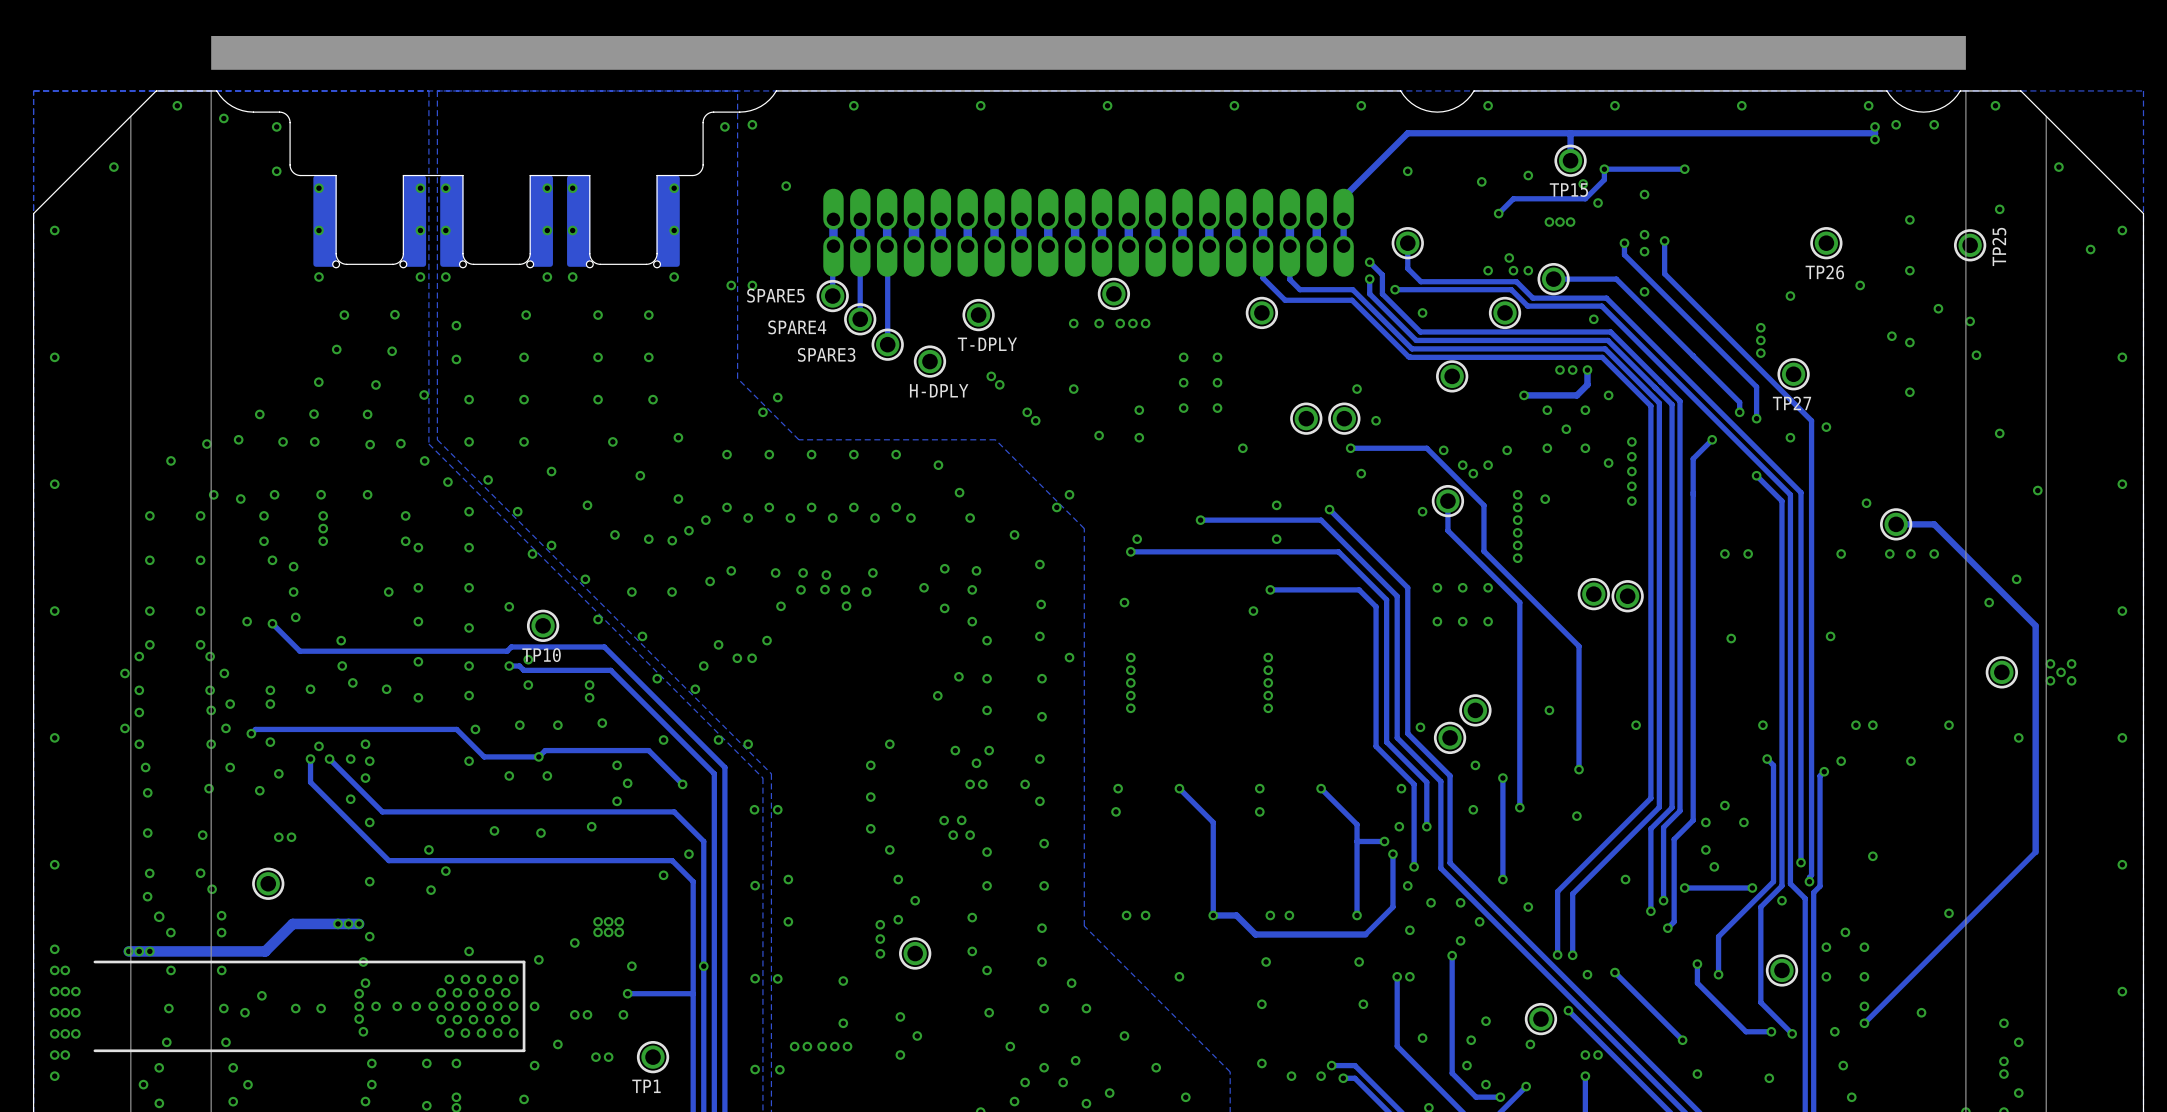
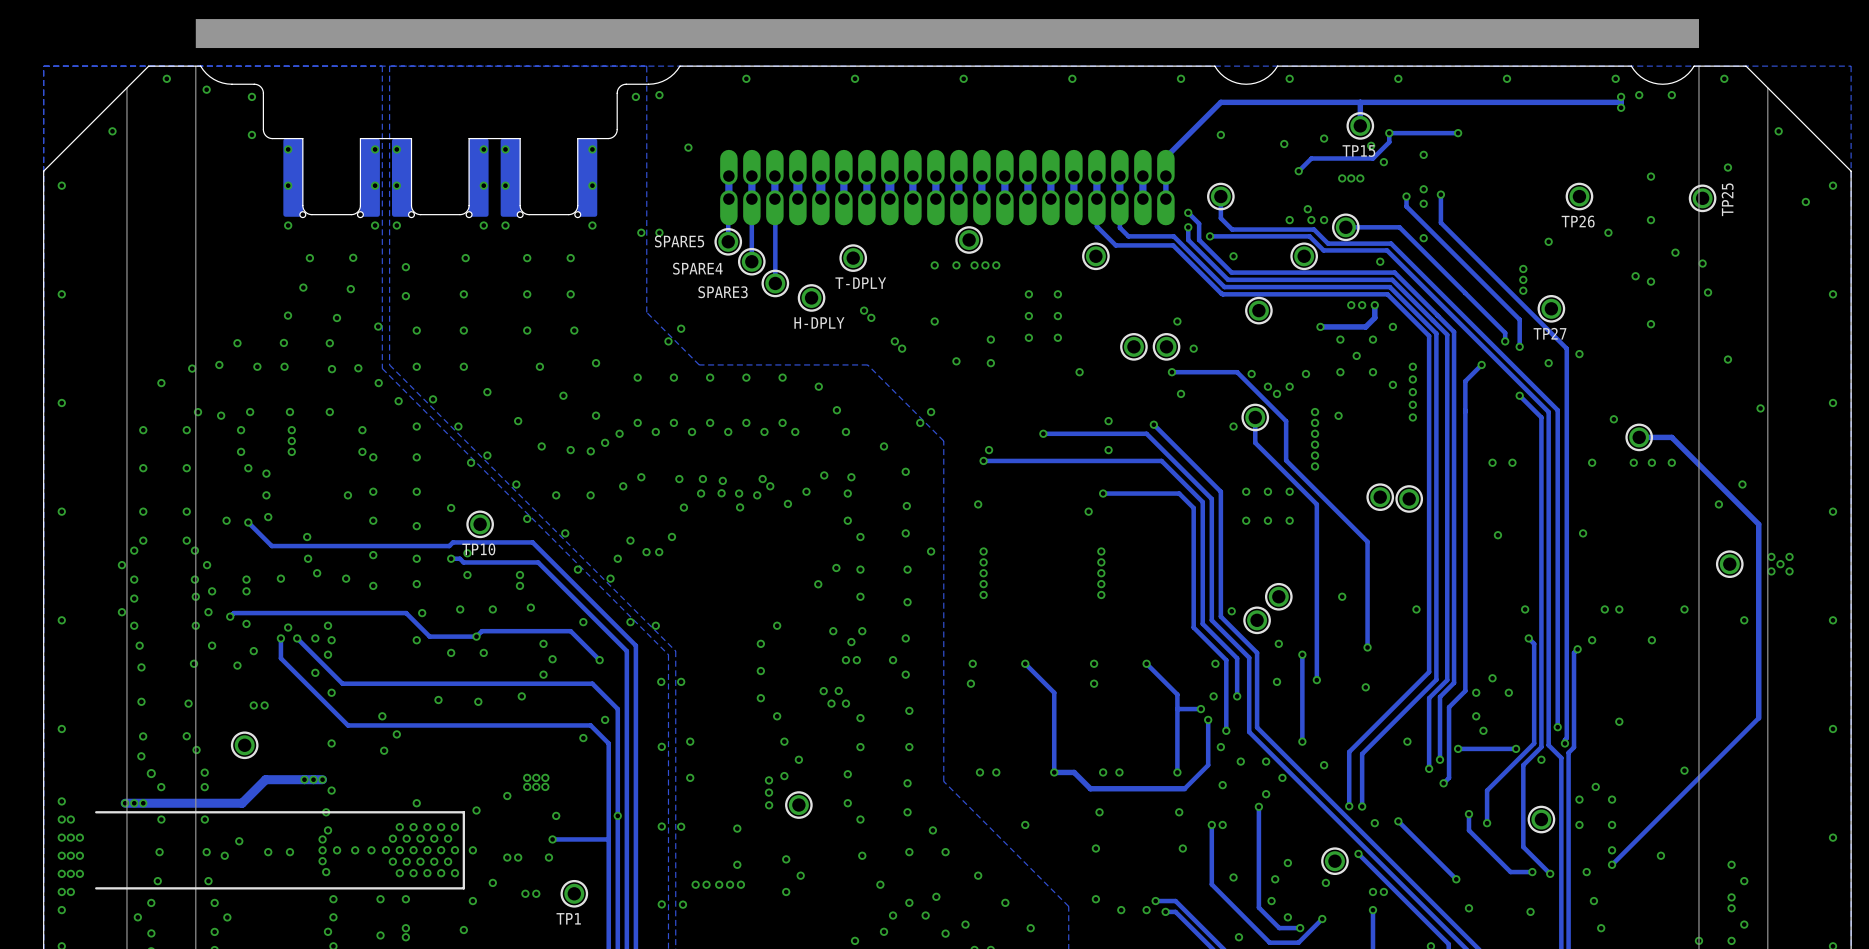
via: none -> (770, 486)
via: none -> (787, 503)
via: (944, 608) -> none

